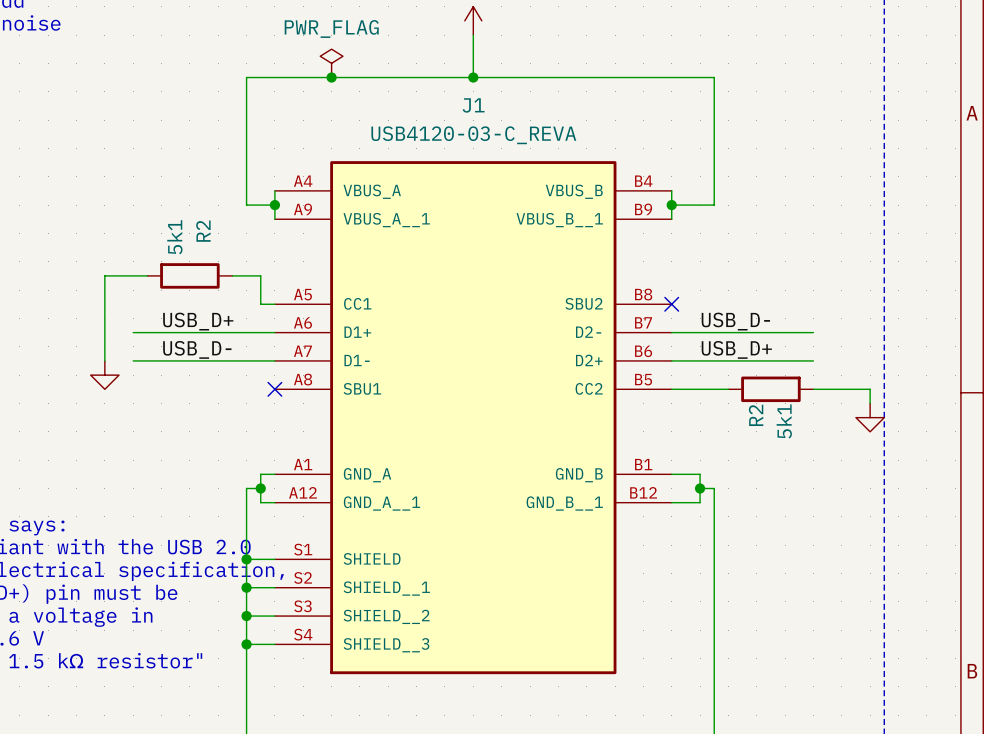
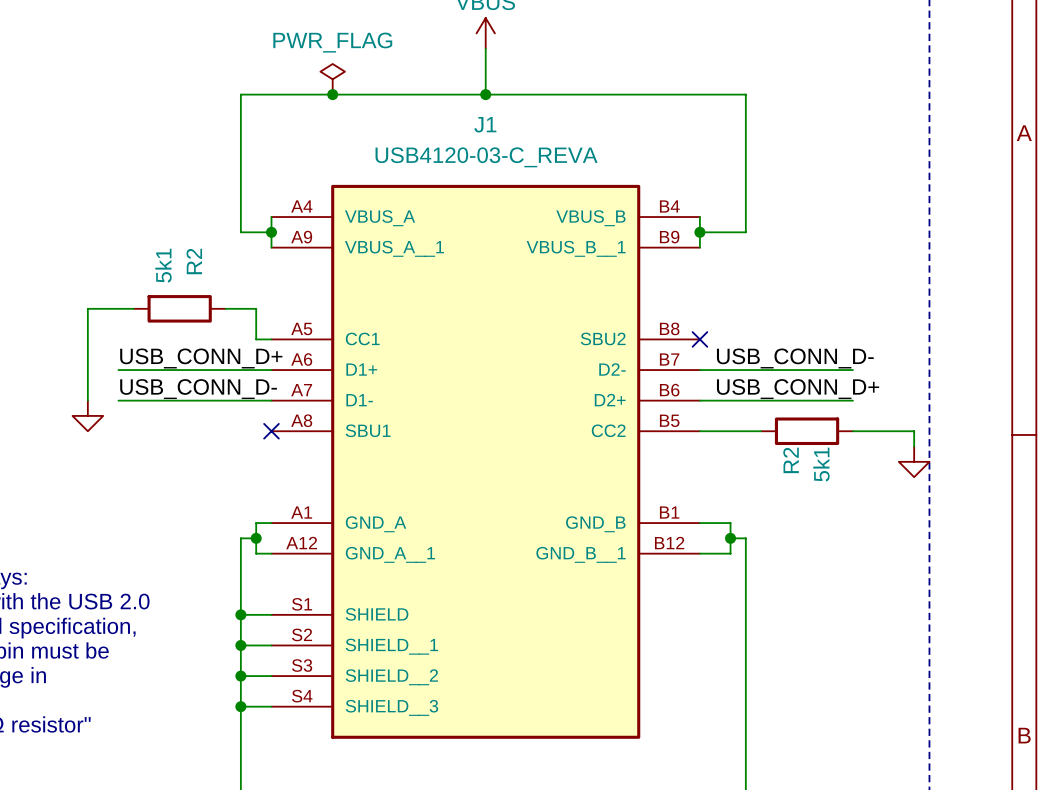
label: USB_D+ (198, 321) -> USB_CONN_D+ (201, 358)
label: USB_D- (735, 321) -> USB_CONN_D- (795, 358)
label: USB_D- (197, 349) -> USB_CONN_D- (198, 389)
label: USB_D+ (736, 349) -> USB_CONN_D+ (798, 389)

